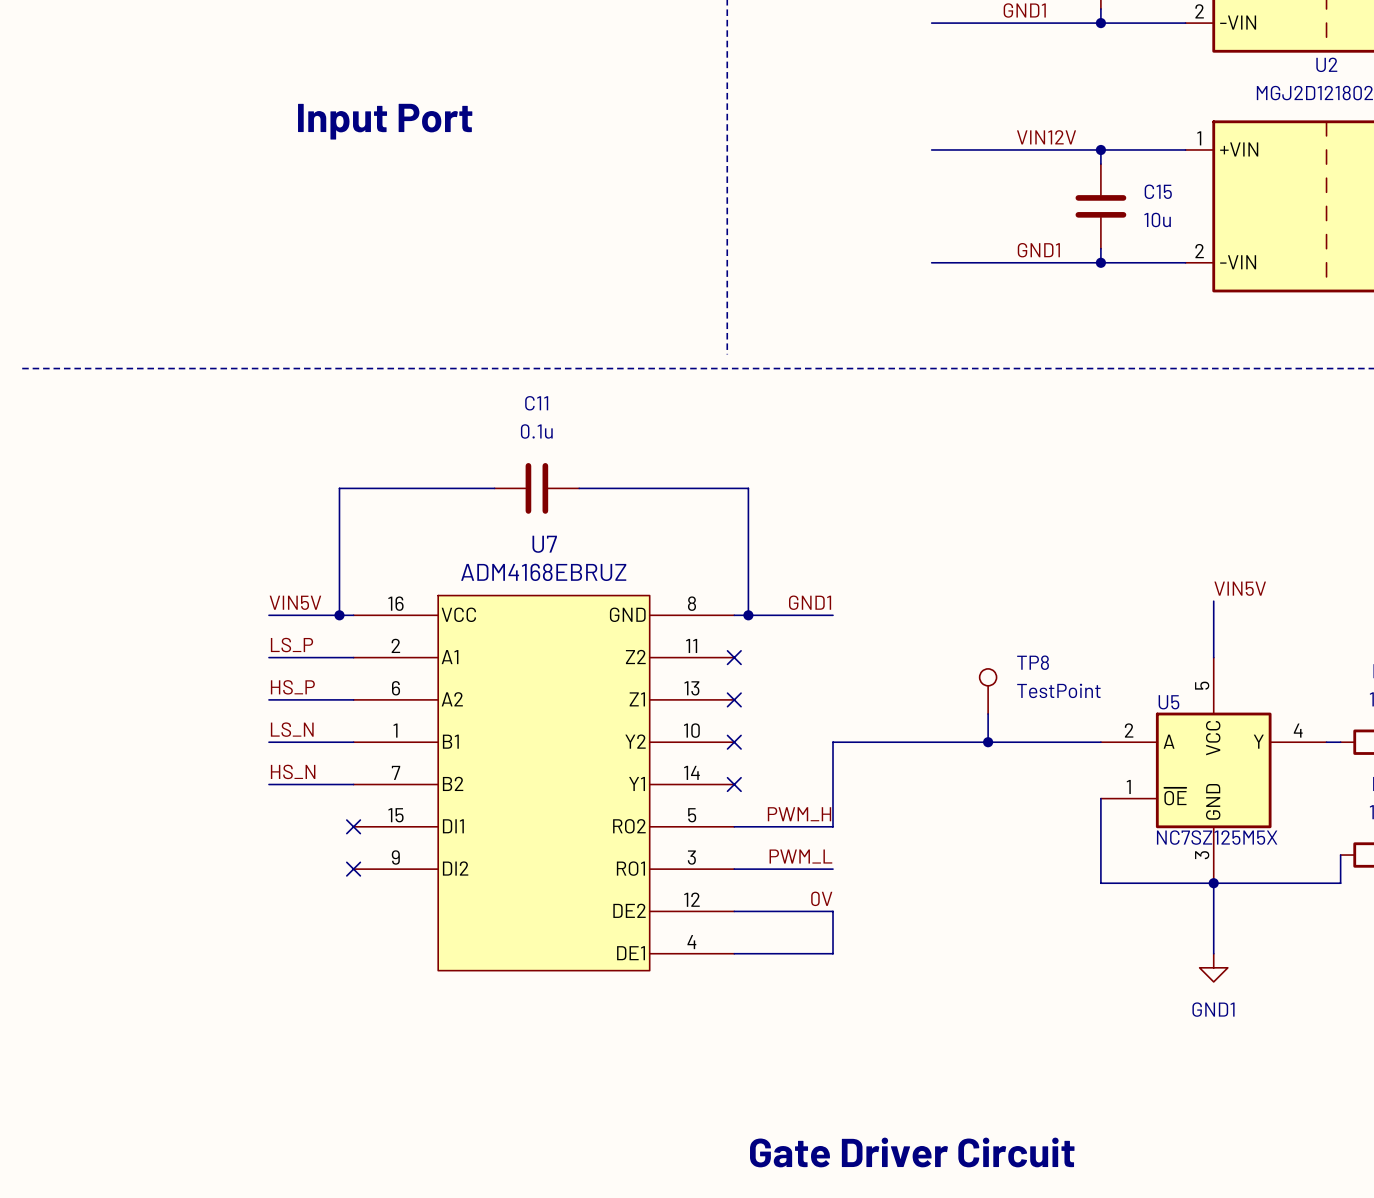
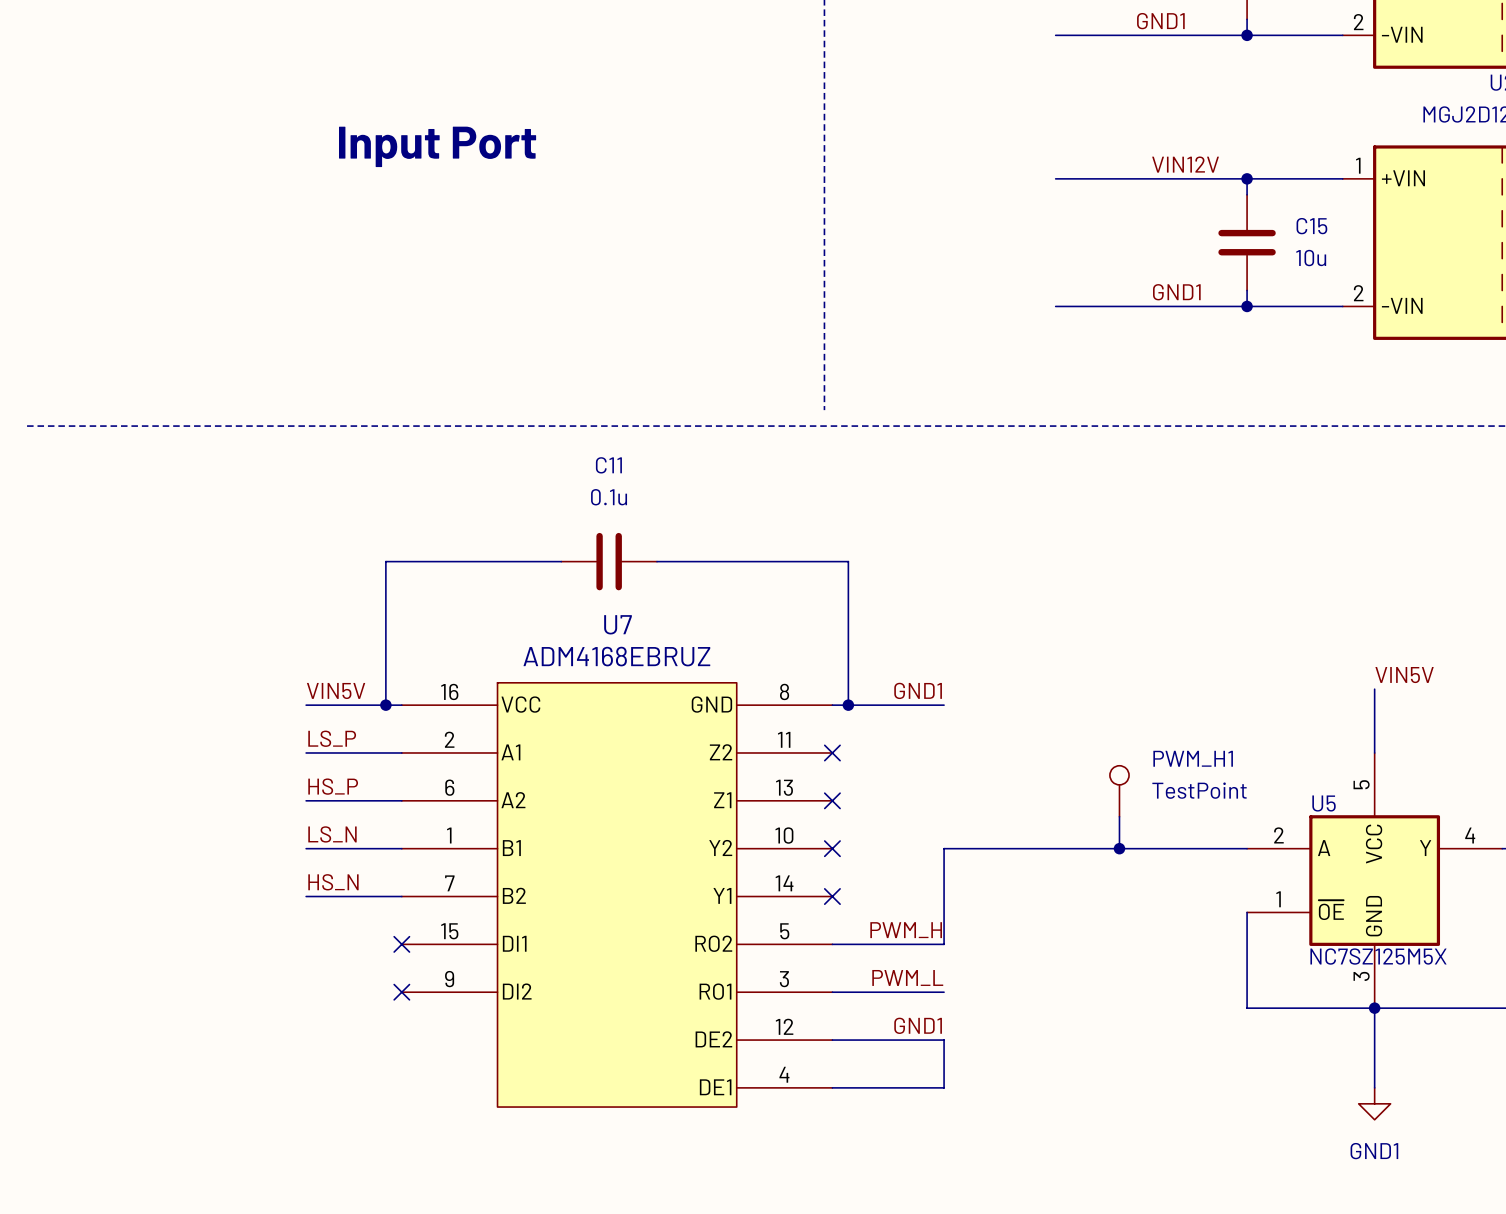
TP8 name: TP8 (1033, 662) -> PWM_H1 (1193, 758)
label: 0V (821, 898) -> GND1 (918, 1025)

